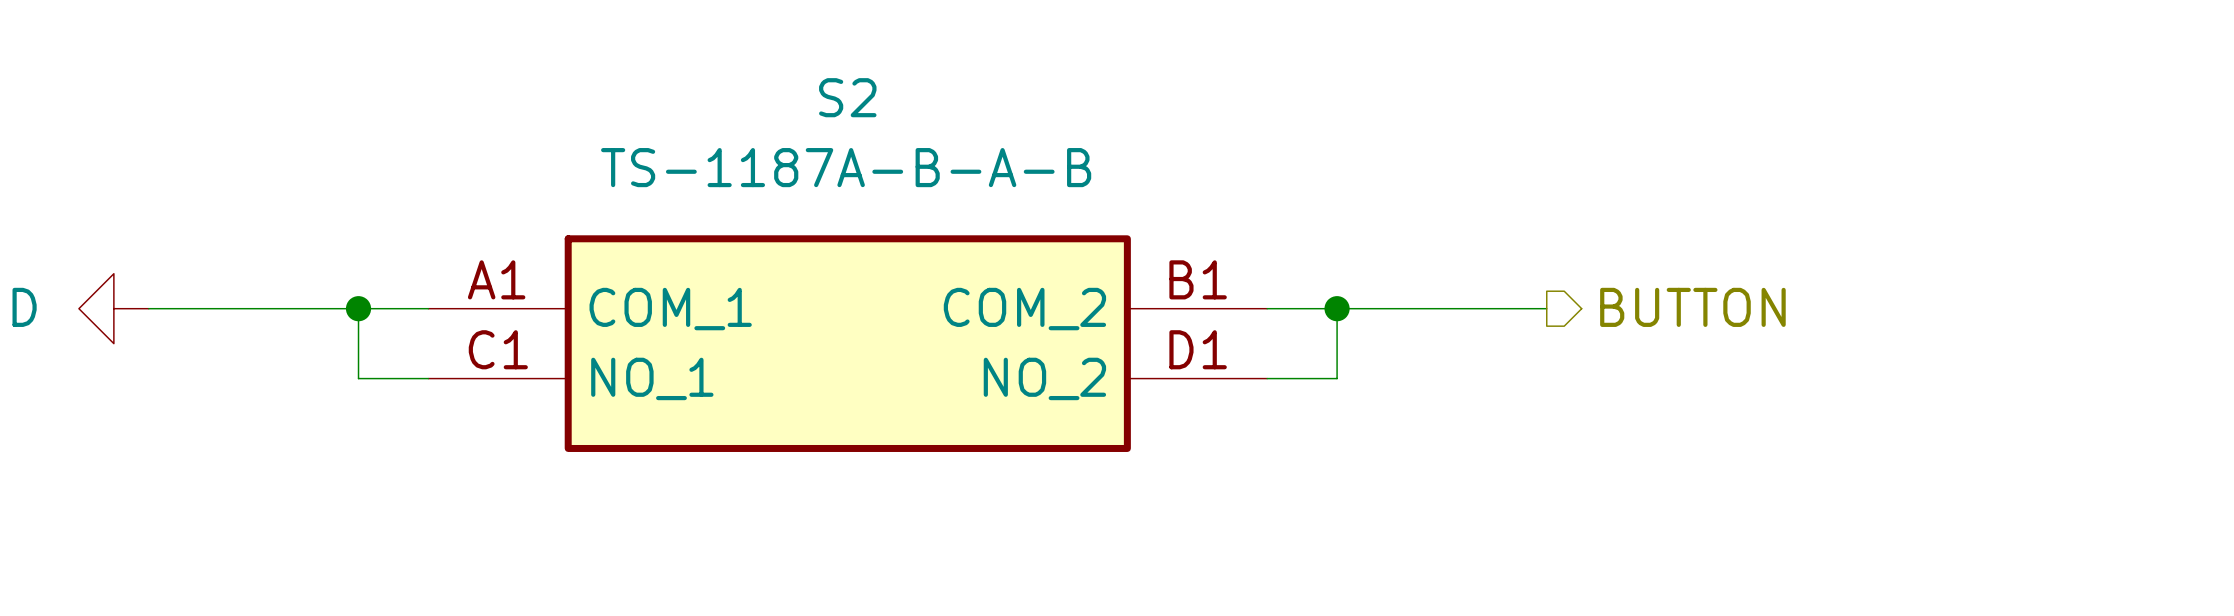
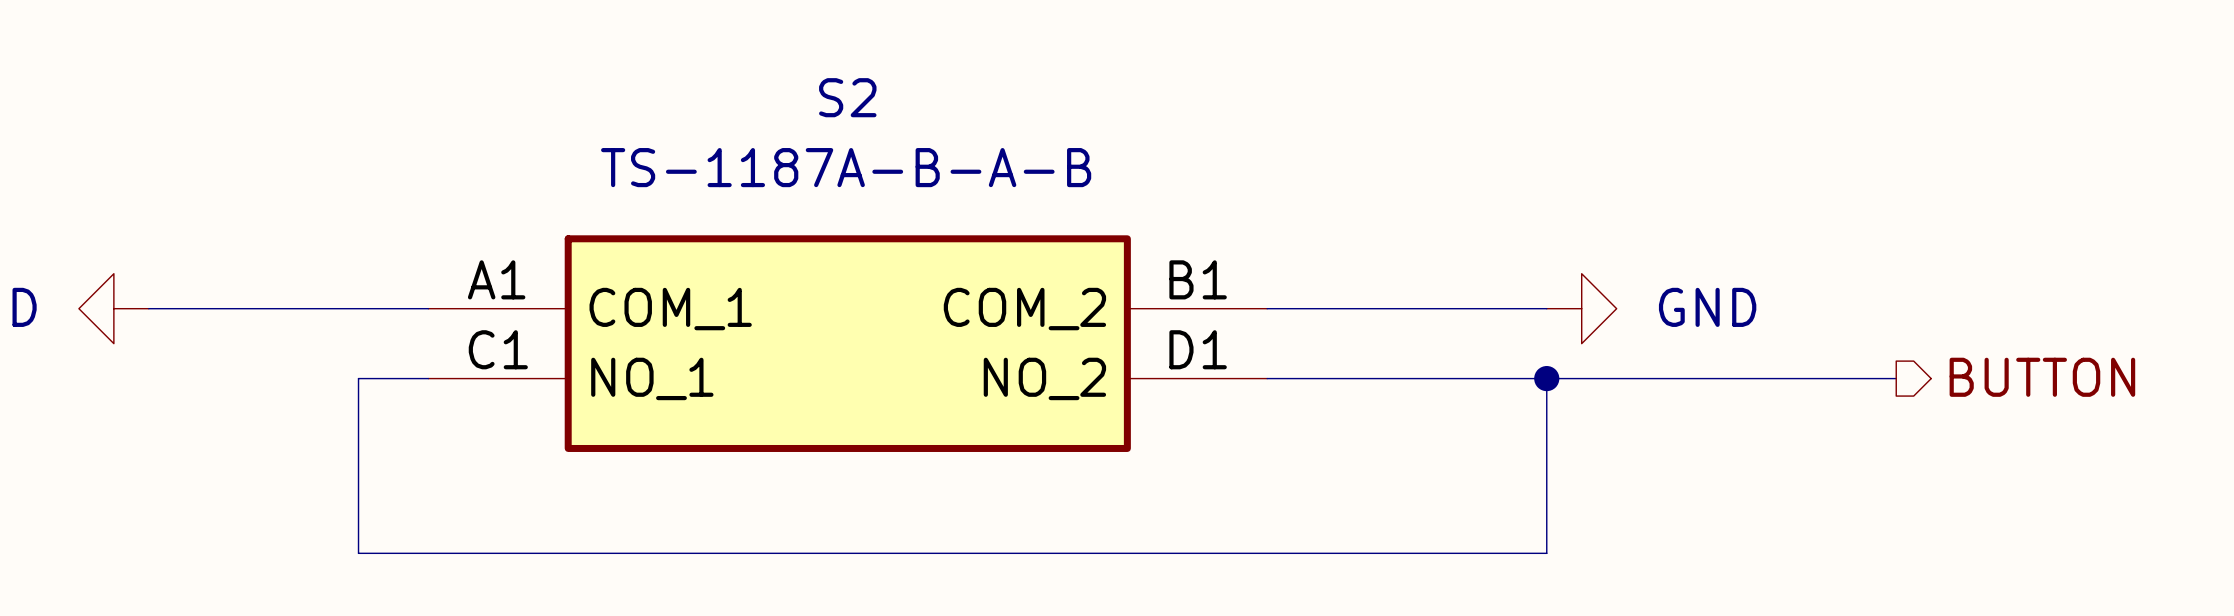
hierarchical label position: BUTTON (1692, 307) -> BUTTON (2042, 377)
wire: (358, 308) (358, 378) -> (1546, 378) (1546, 553) (358, 553) (358, 378)
junction: (358, 308) -> none
wire: (1337, 308) (1337, 378) -> (1896, 378) (1337, 378)
junction: (1337, 308) -> none
power symbol: none -> GND (1581, 308)
junction: none -> (1546, 378)

